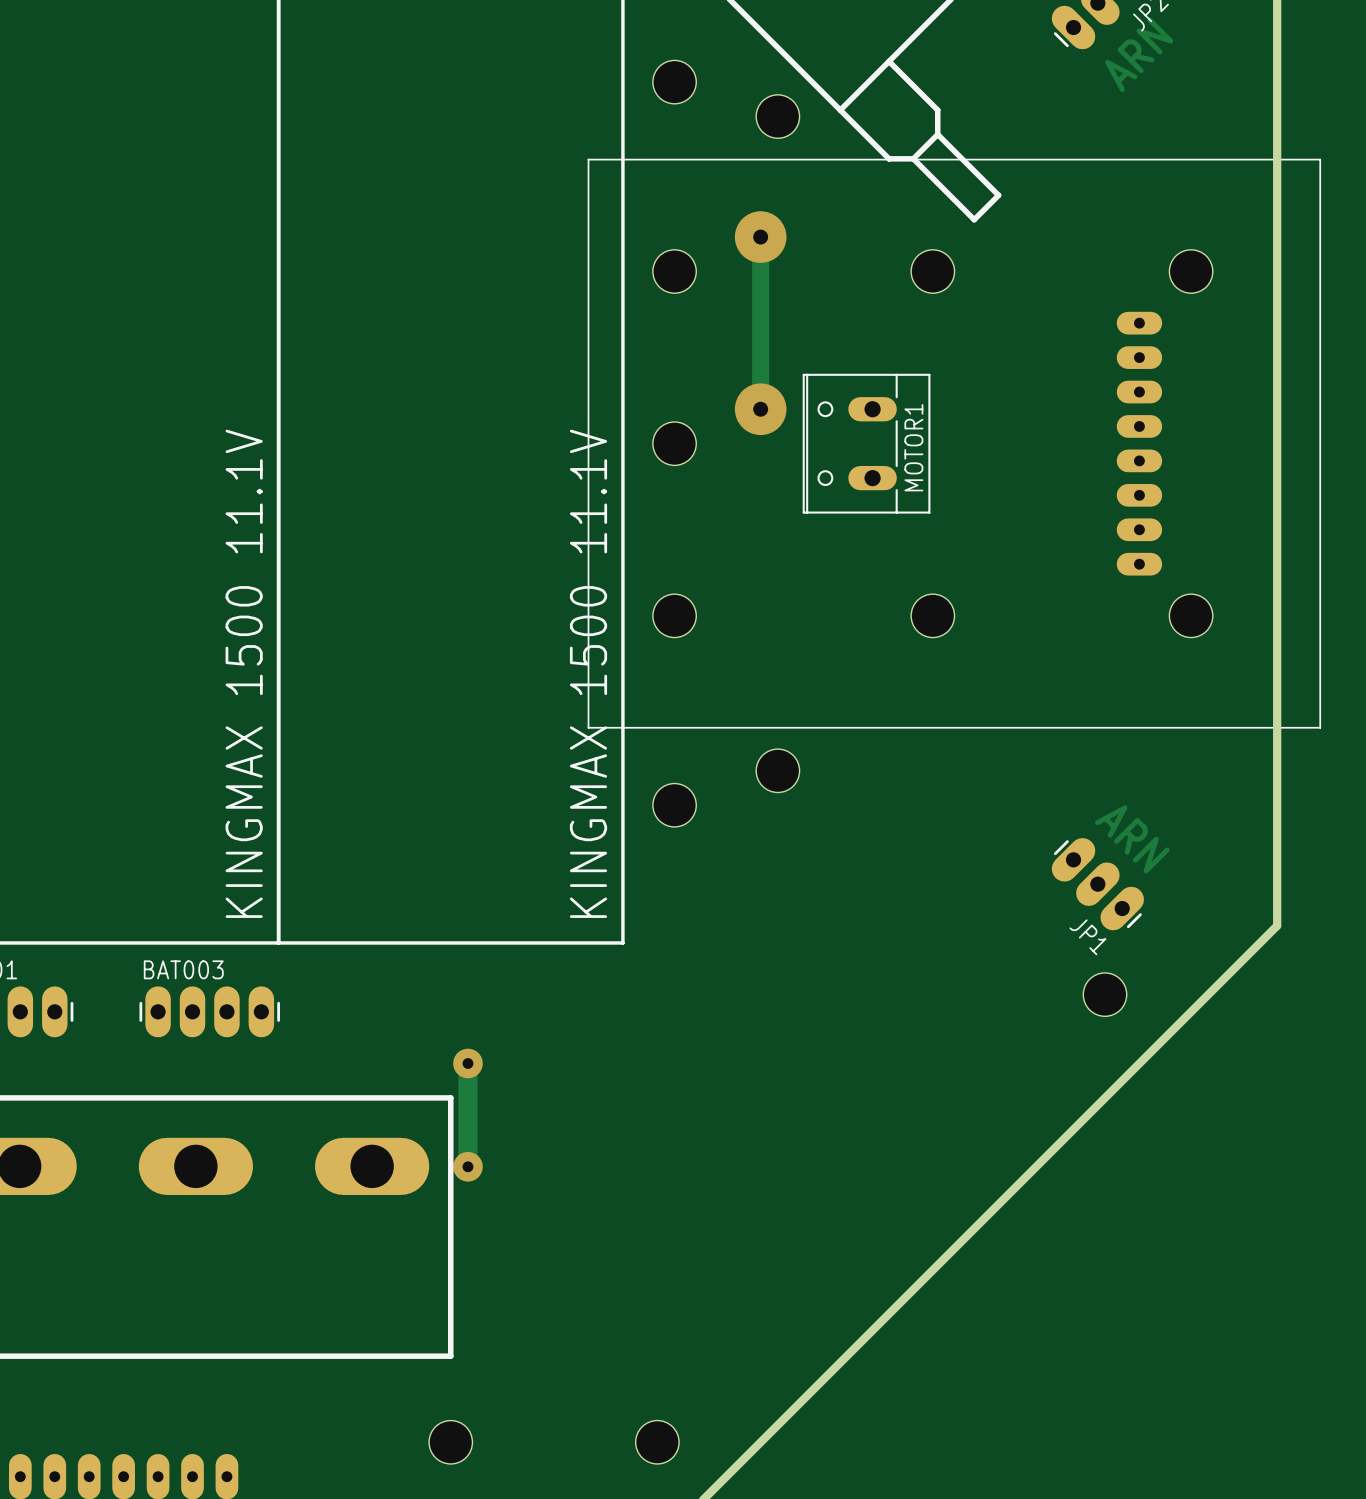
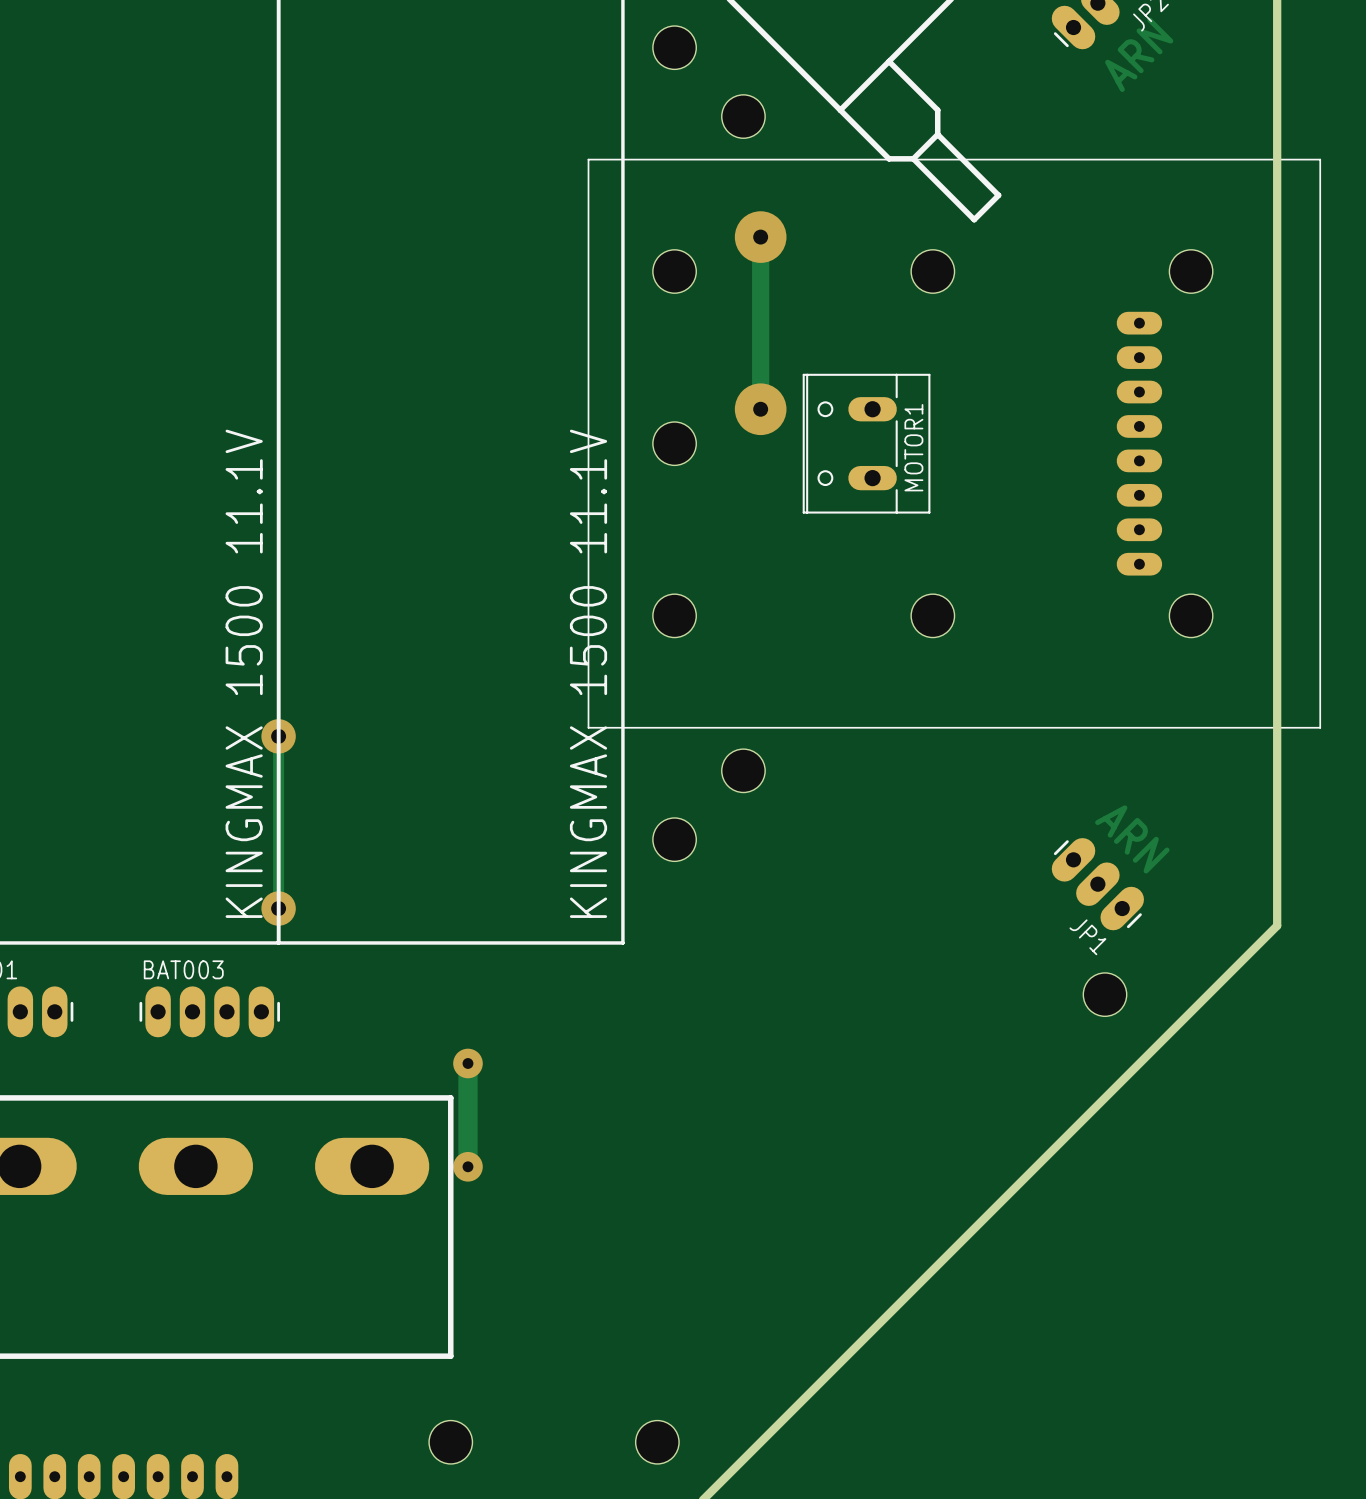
hole position: (674, 82) -> (674, 47)
hole position: (777, 116) -> (743, 116)
track: none -> (278, 736) (278, 908)
via: none -> (278, 736)
hole position: (777, 770) -> (743, 770)
hole position: (674, 805) -> (674, 839)
via: none -> (278, 908)

